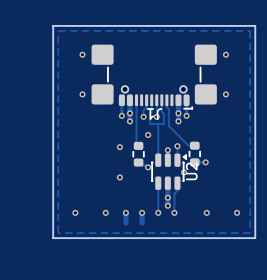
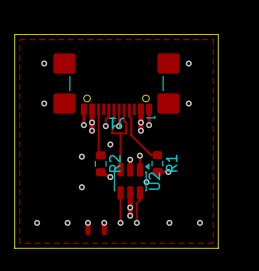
R2 name: none -> R2 (114, 163)
R1 name: none -> R1 (171, 163)

